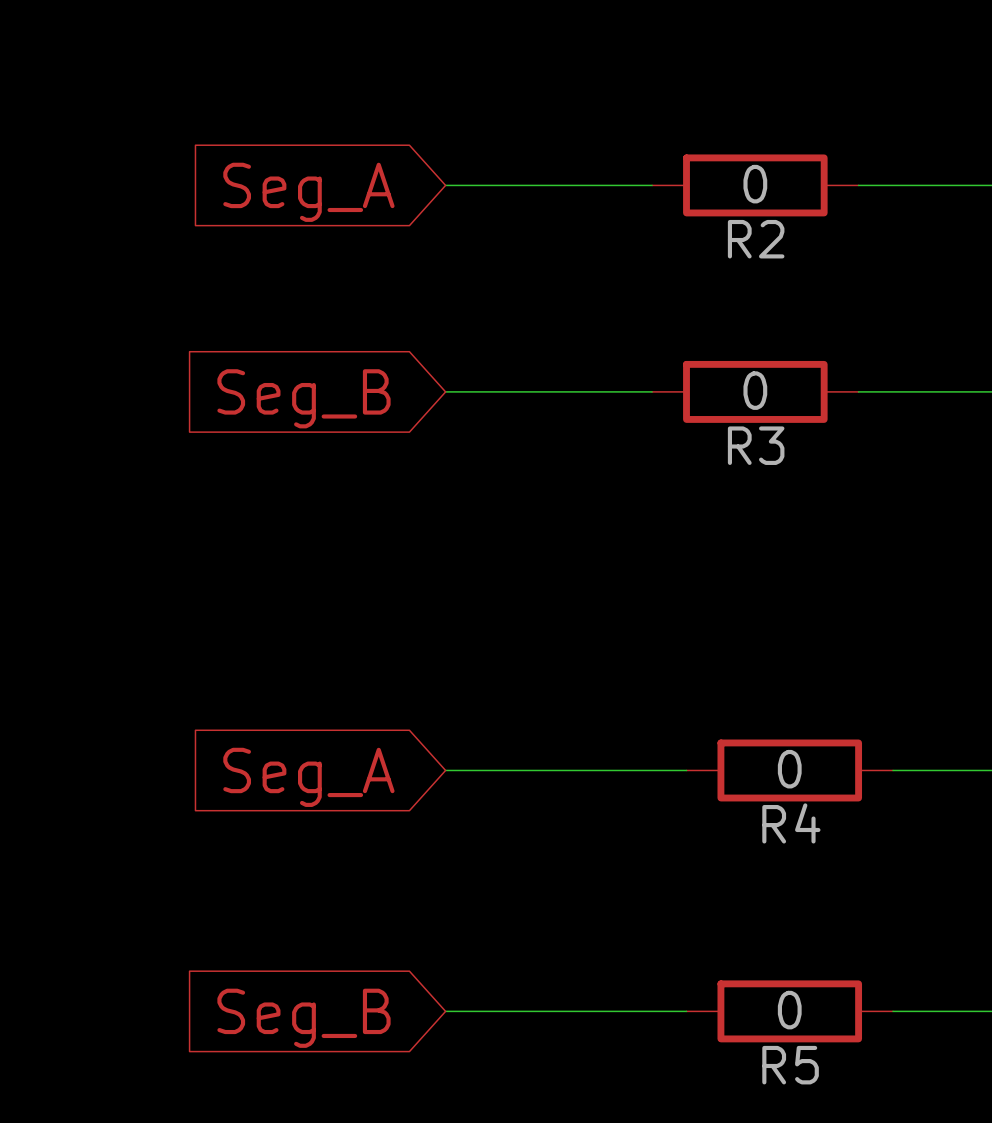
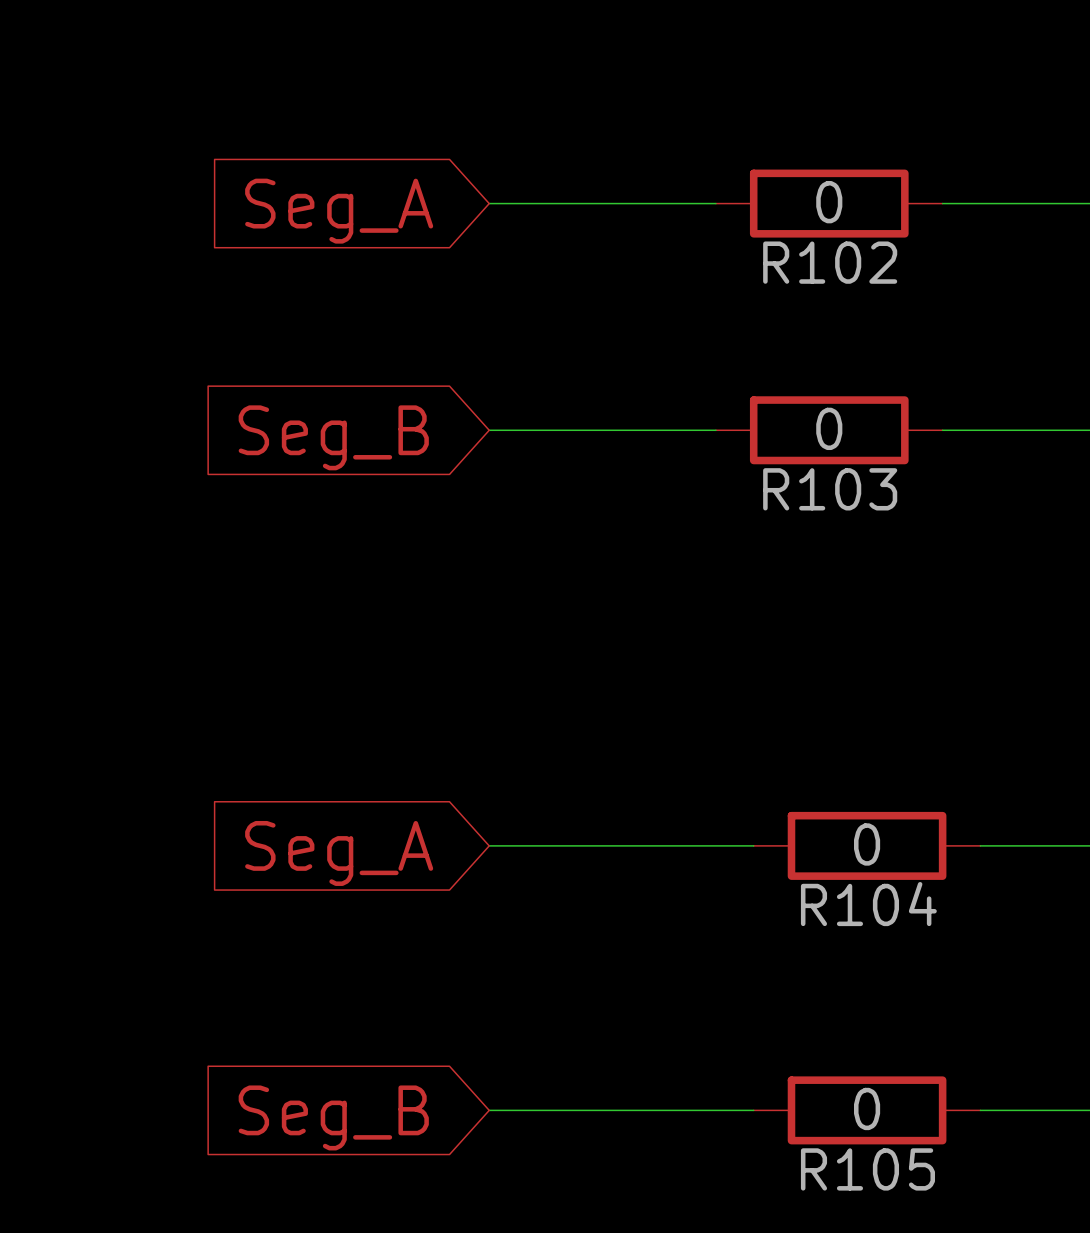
R2 name: R2 (756, 239) -> R102 (830, 262)
R3 name: R3 (756, 445) -> R103 (830, 489)
R4 name: R4 (791, 823) -> R104 (868, 904)
R5 name: R5 (790, 1065) -> R105 (867, 1169)

